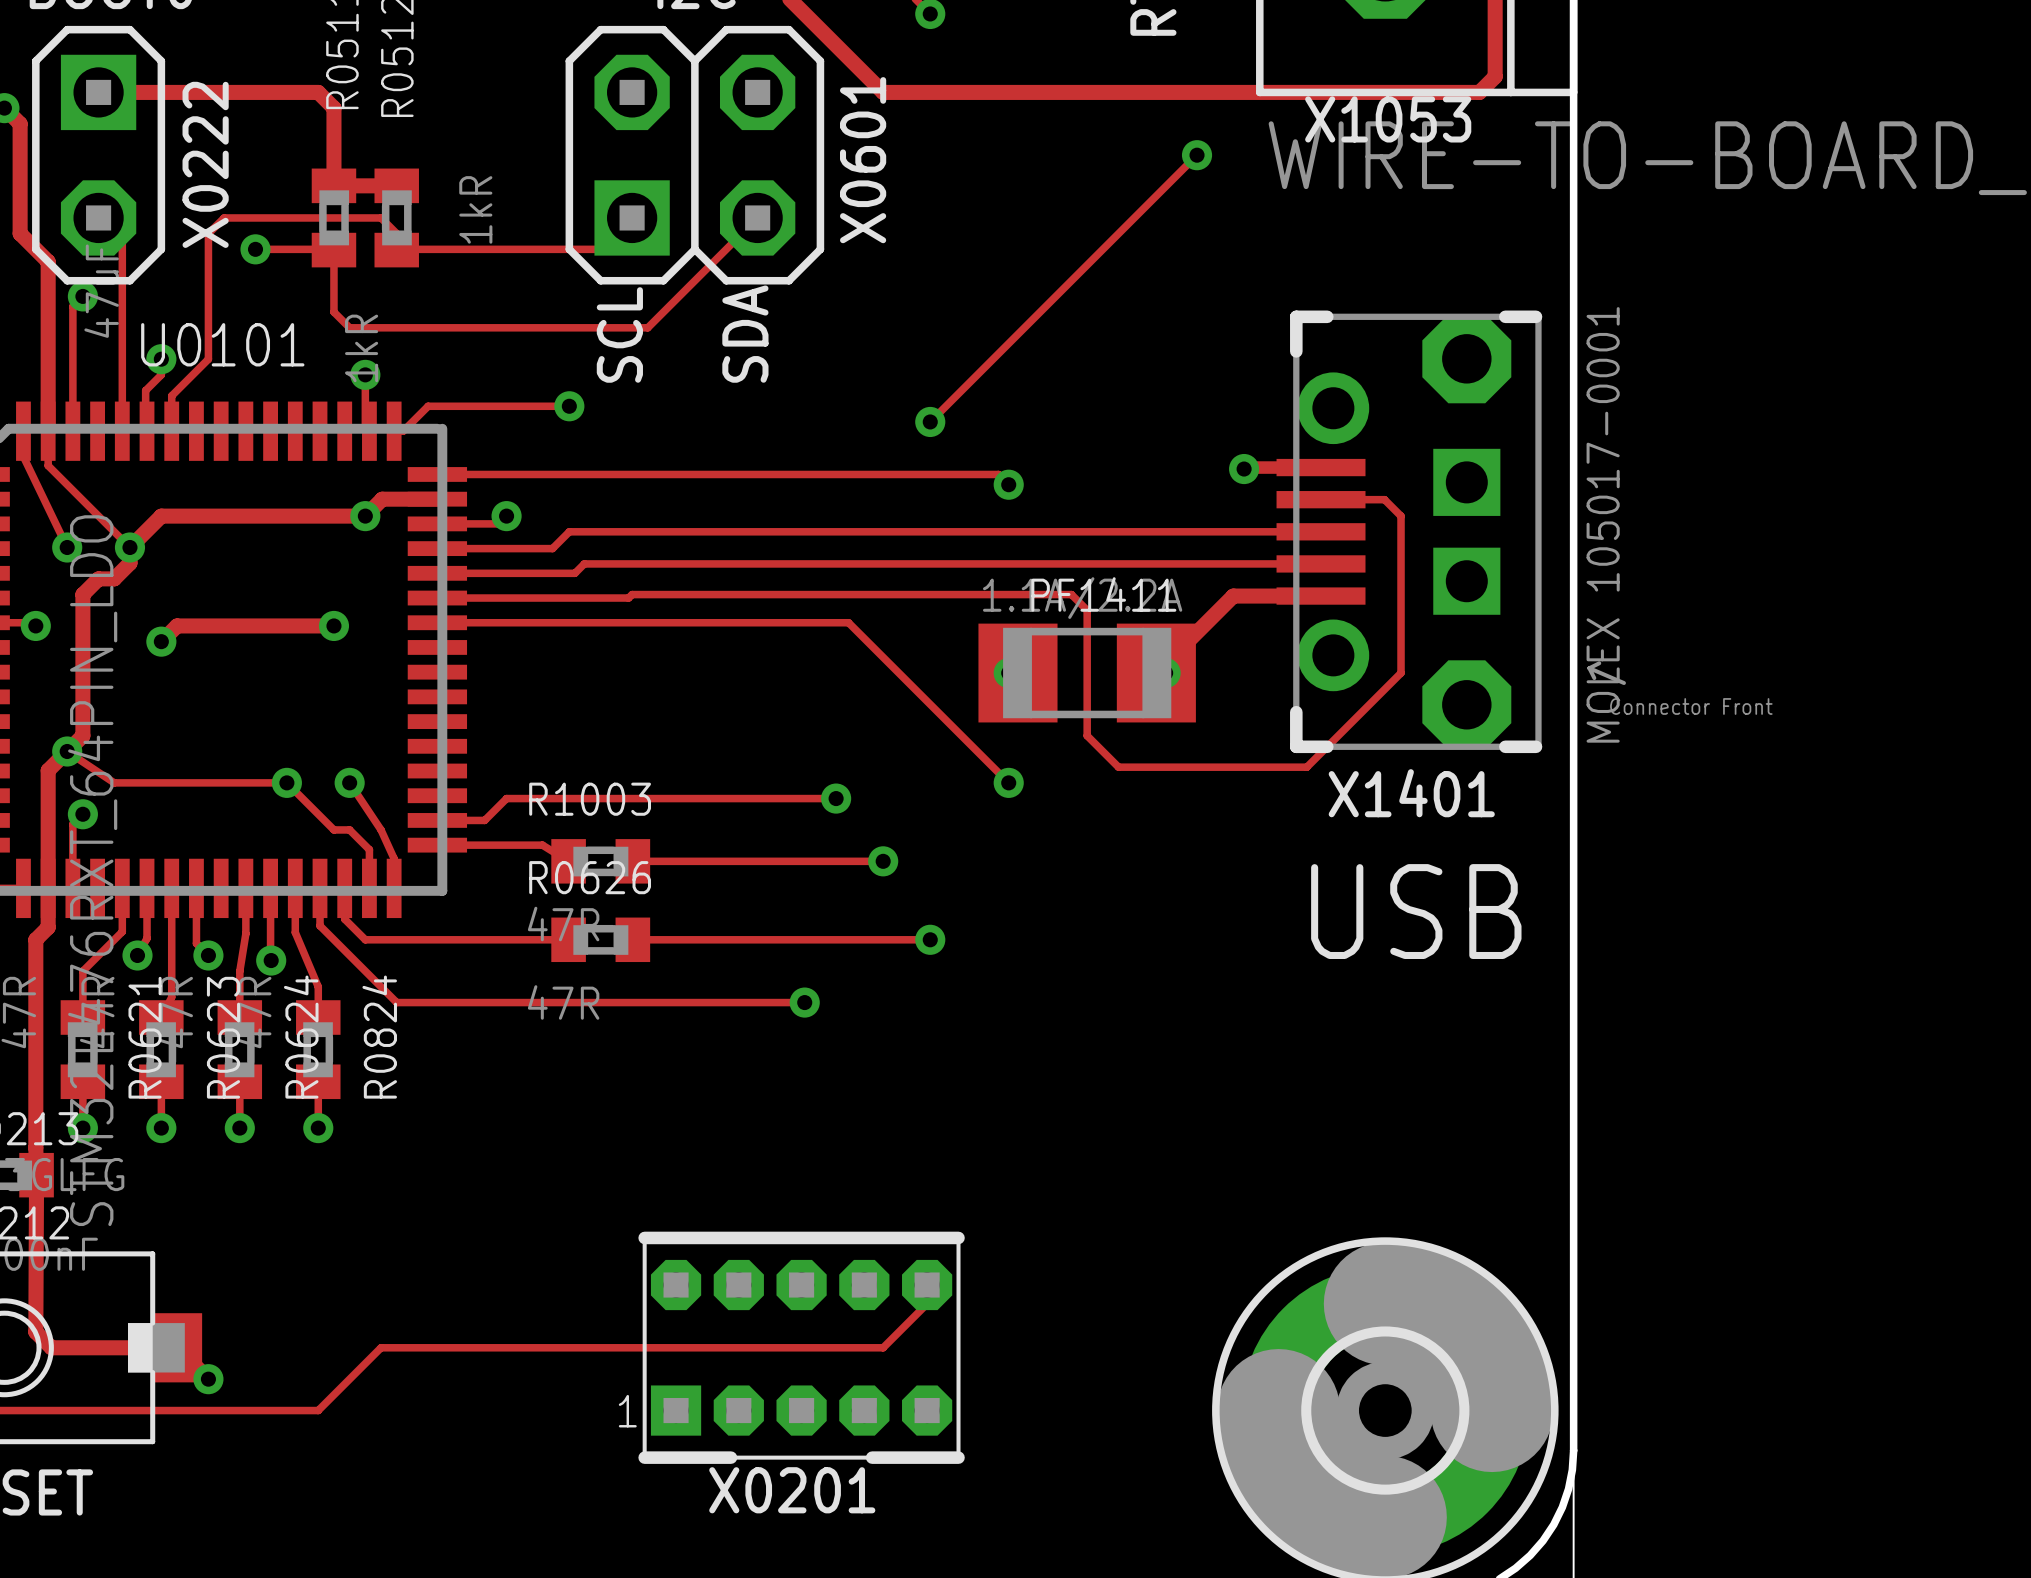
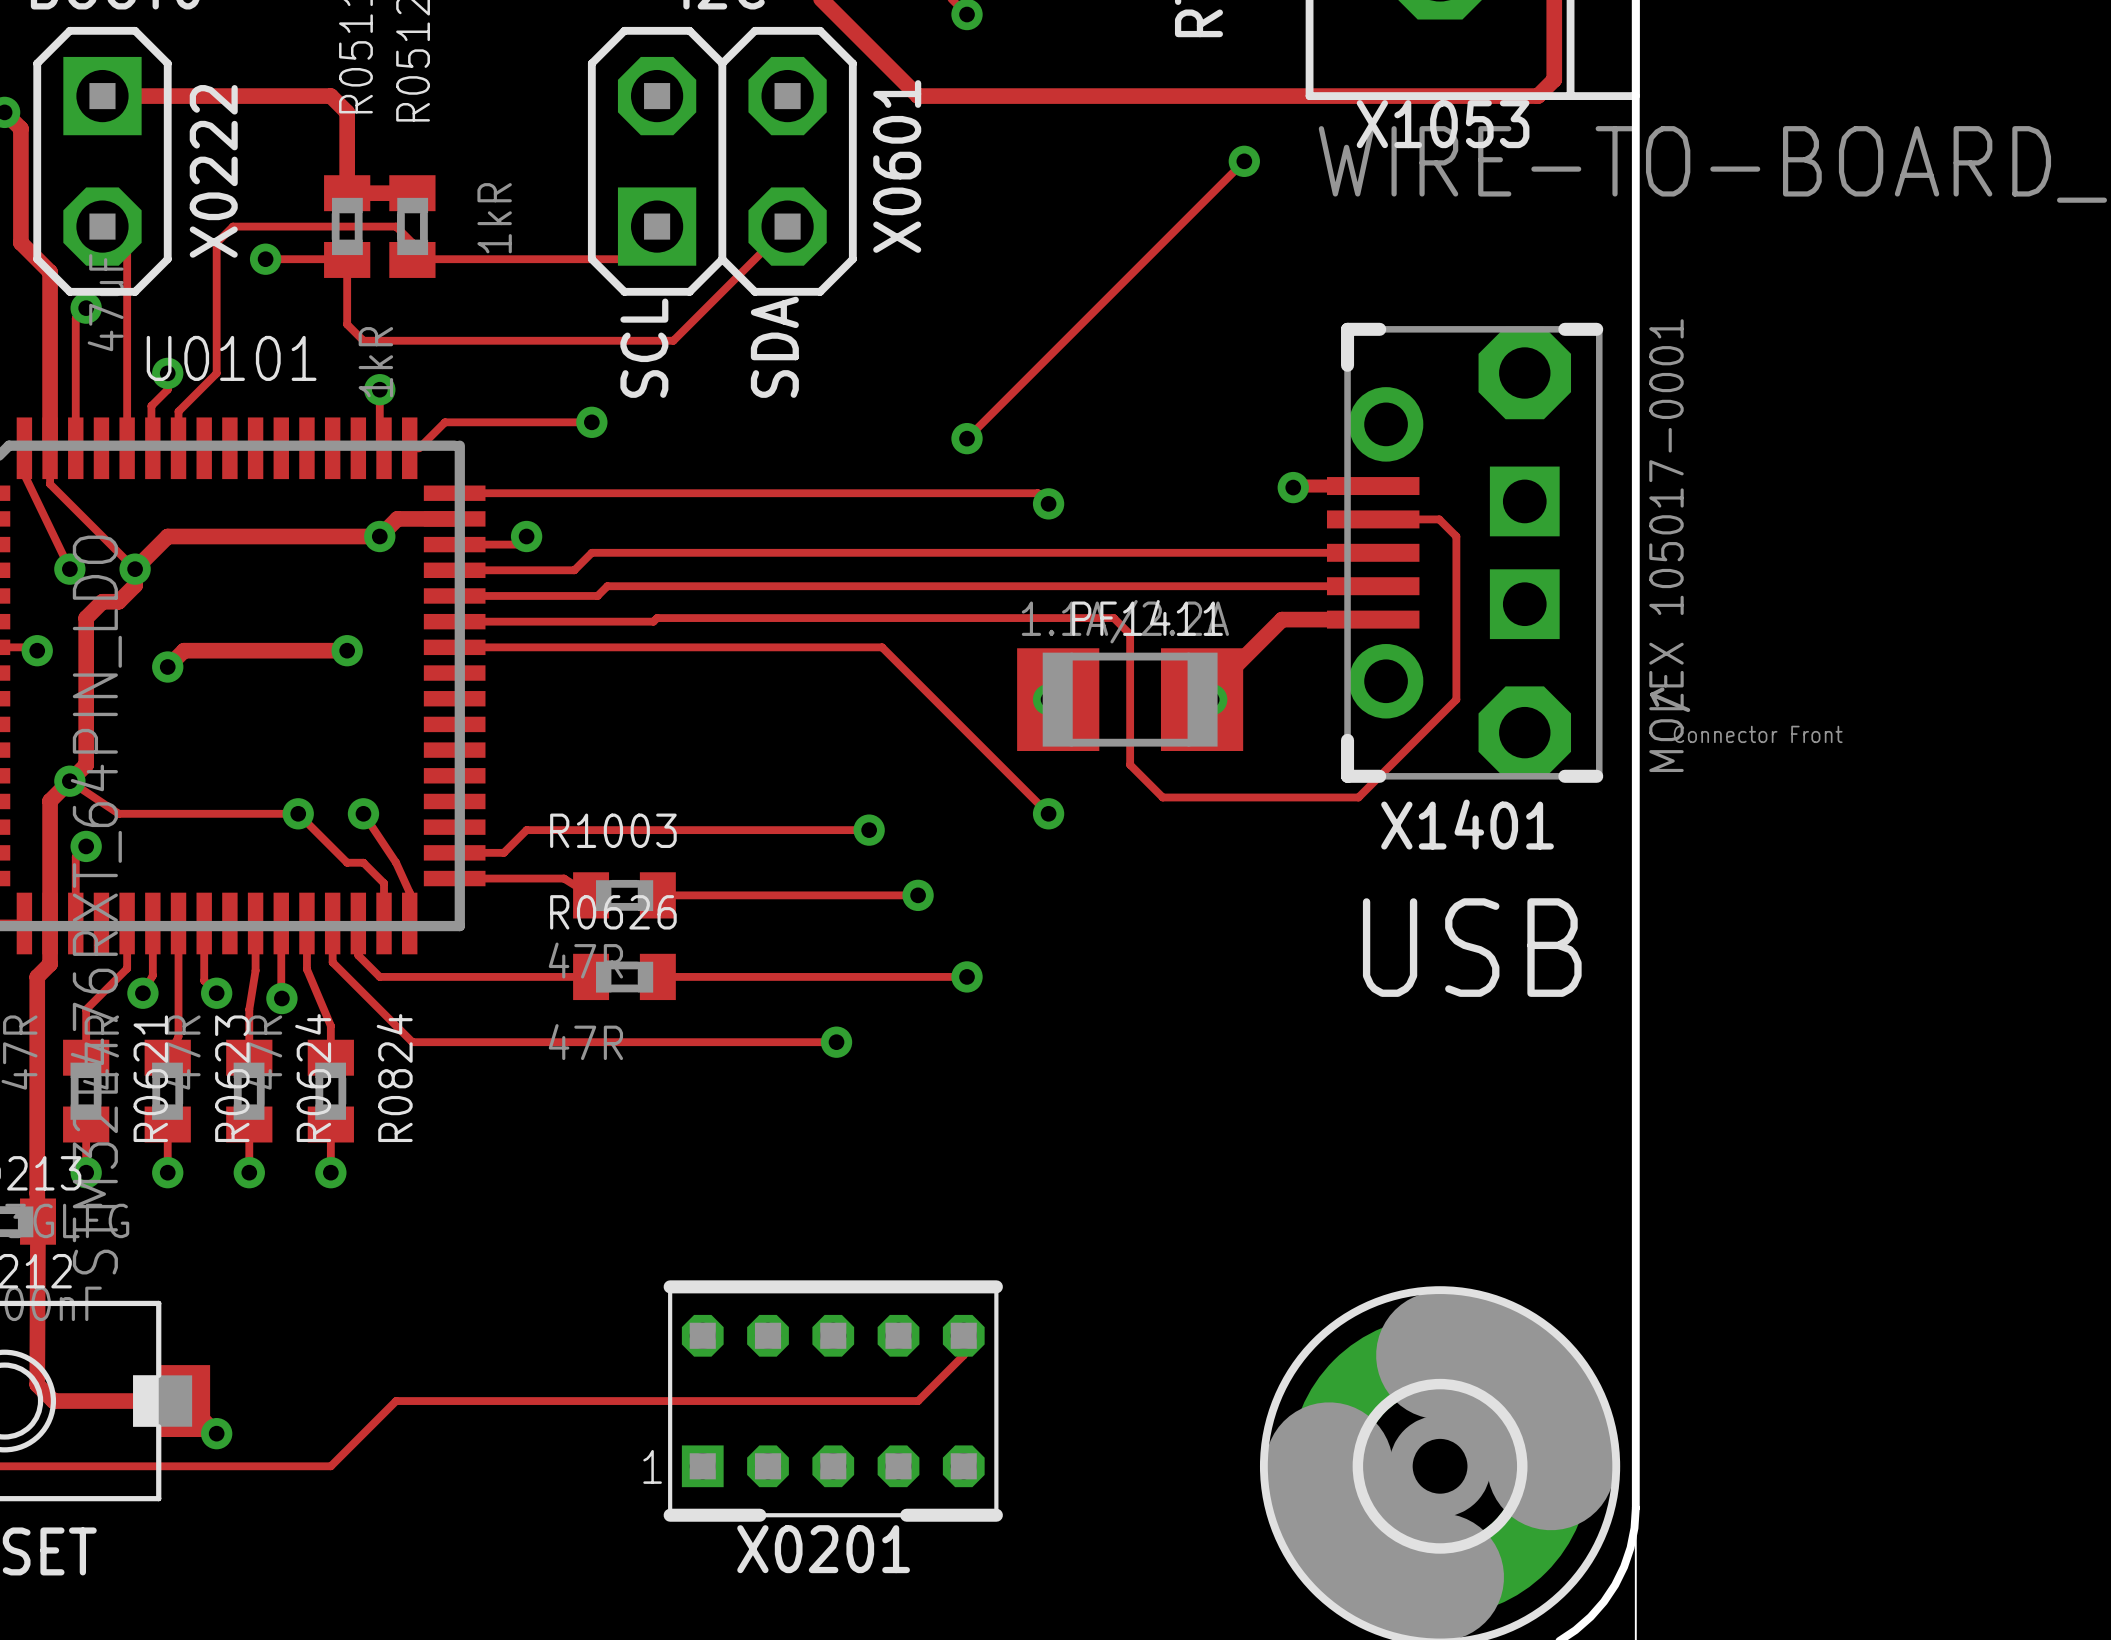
X0201 footprint: [638, 1231, 965, 1464] -> [663, 1280, 1003, 1522]

